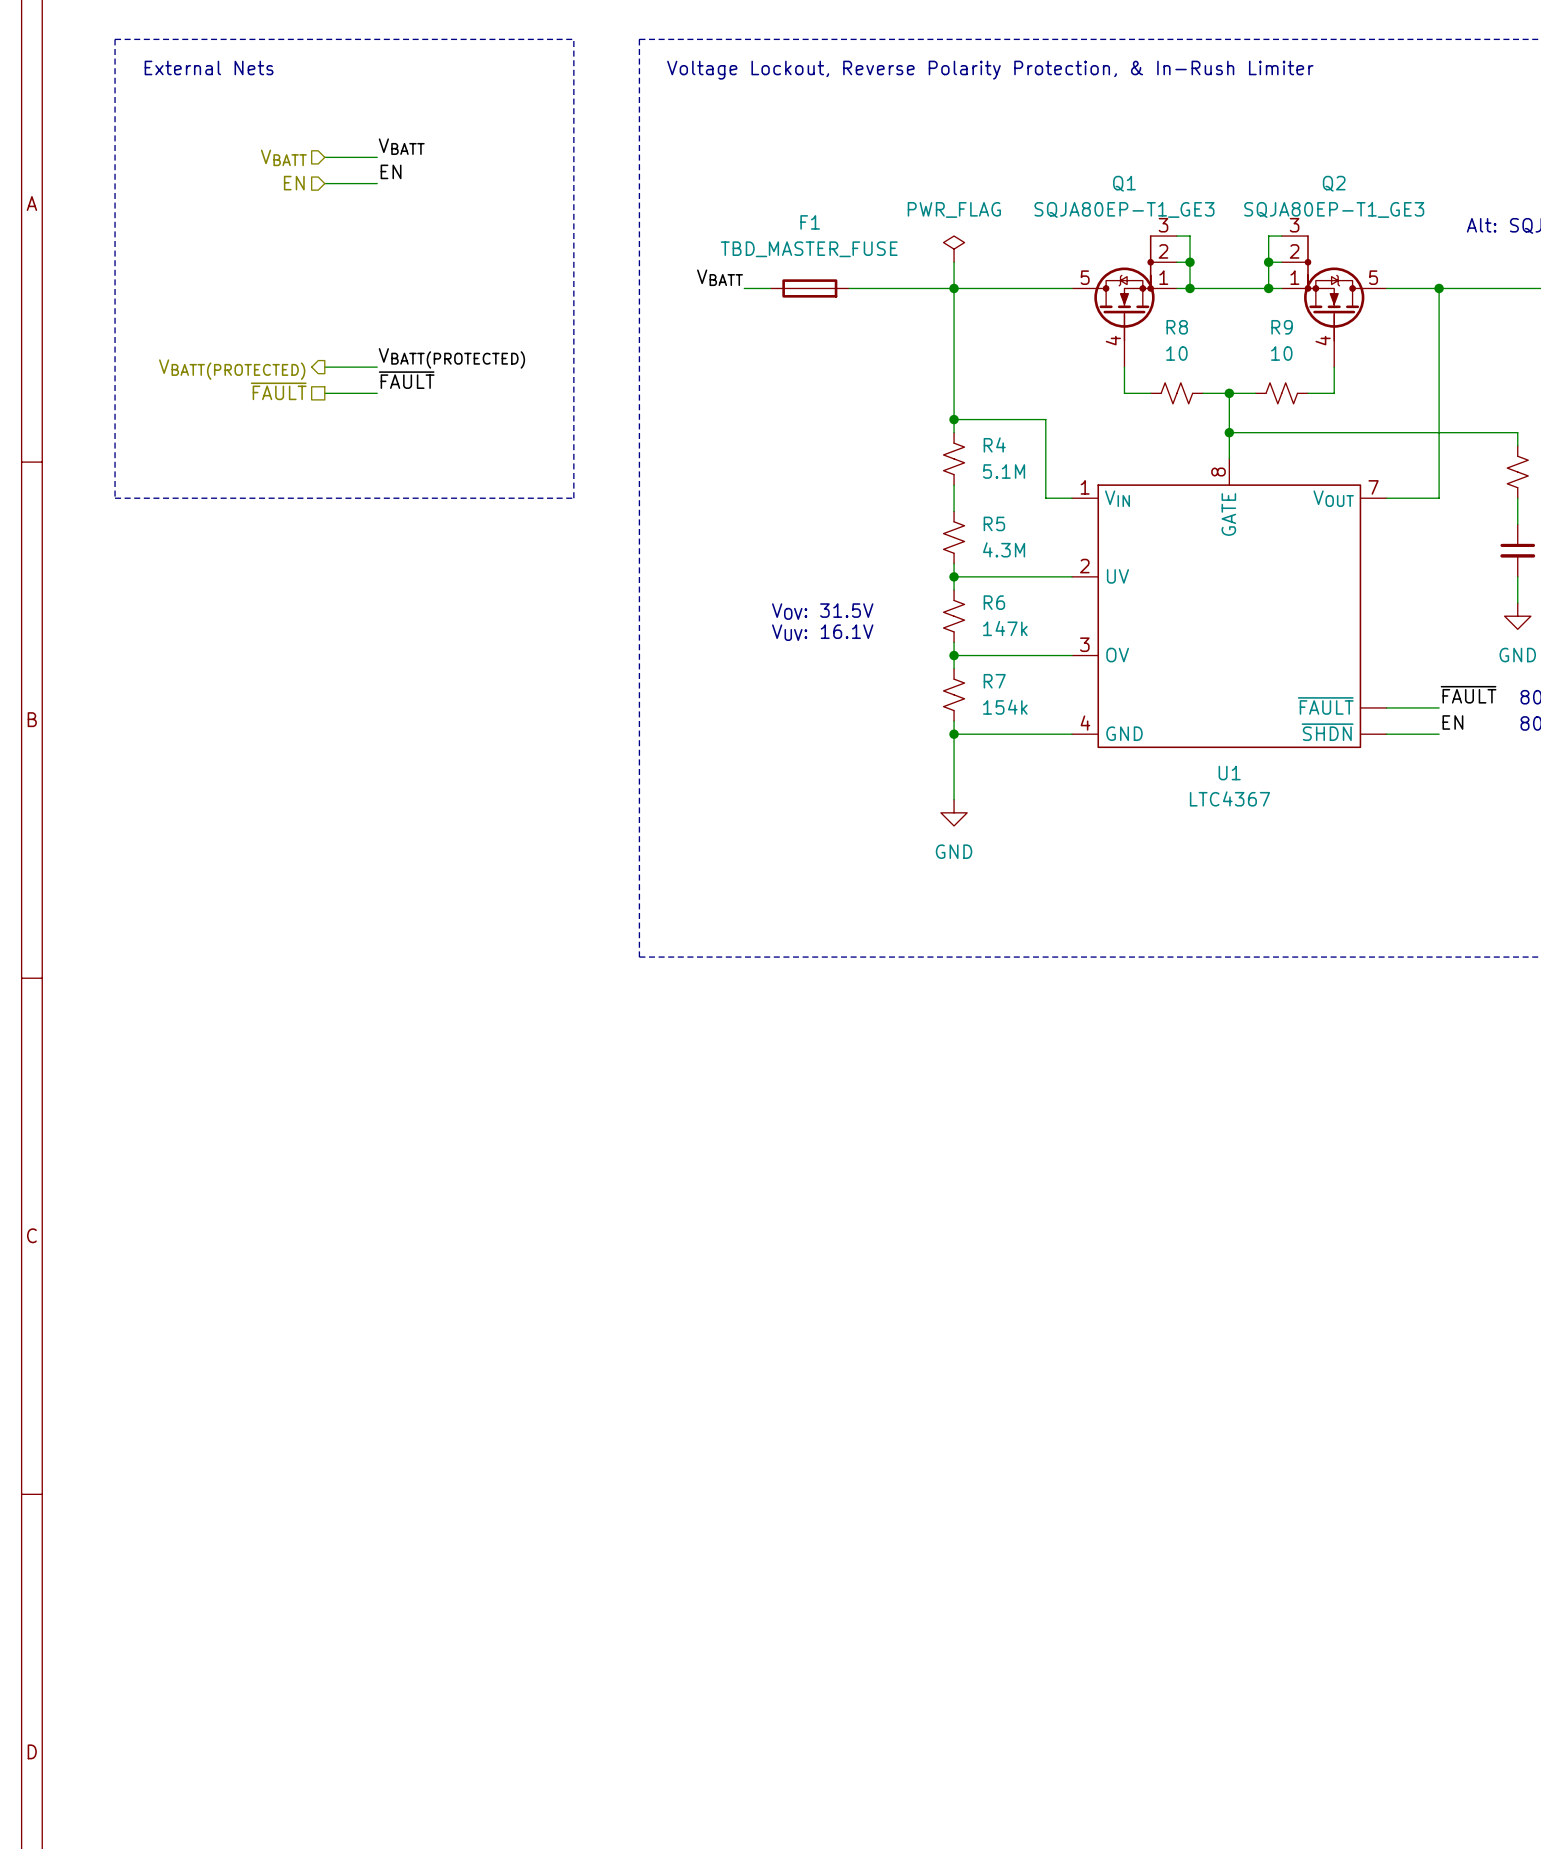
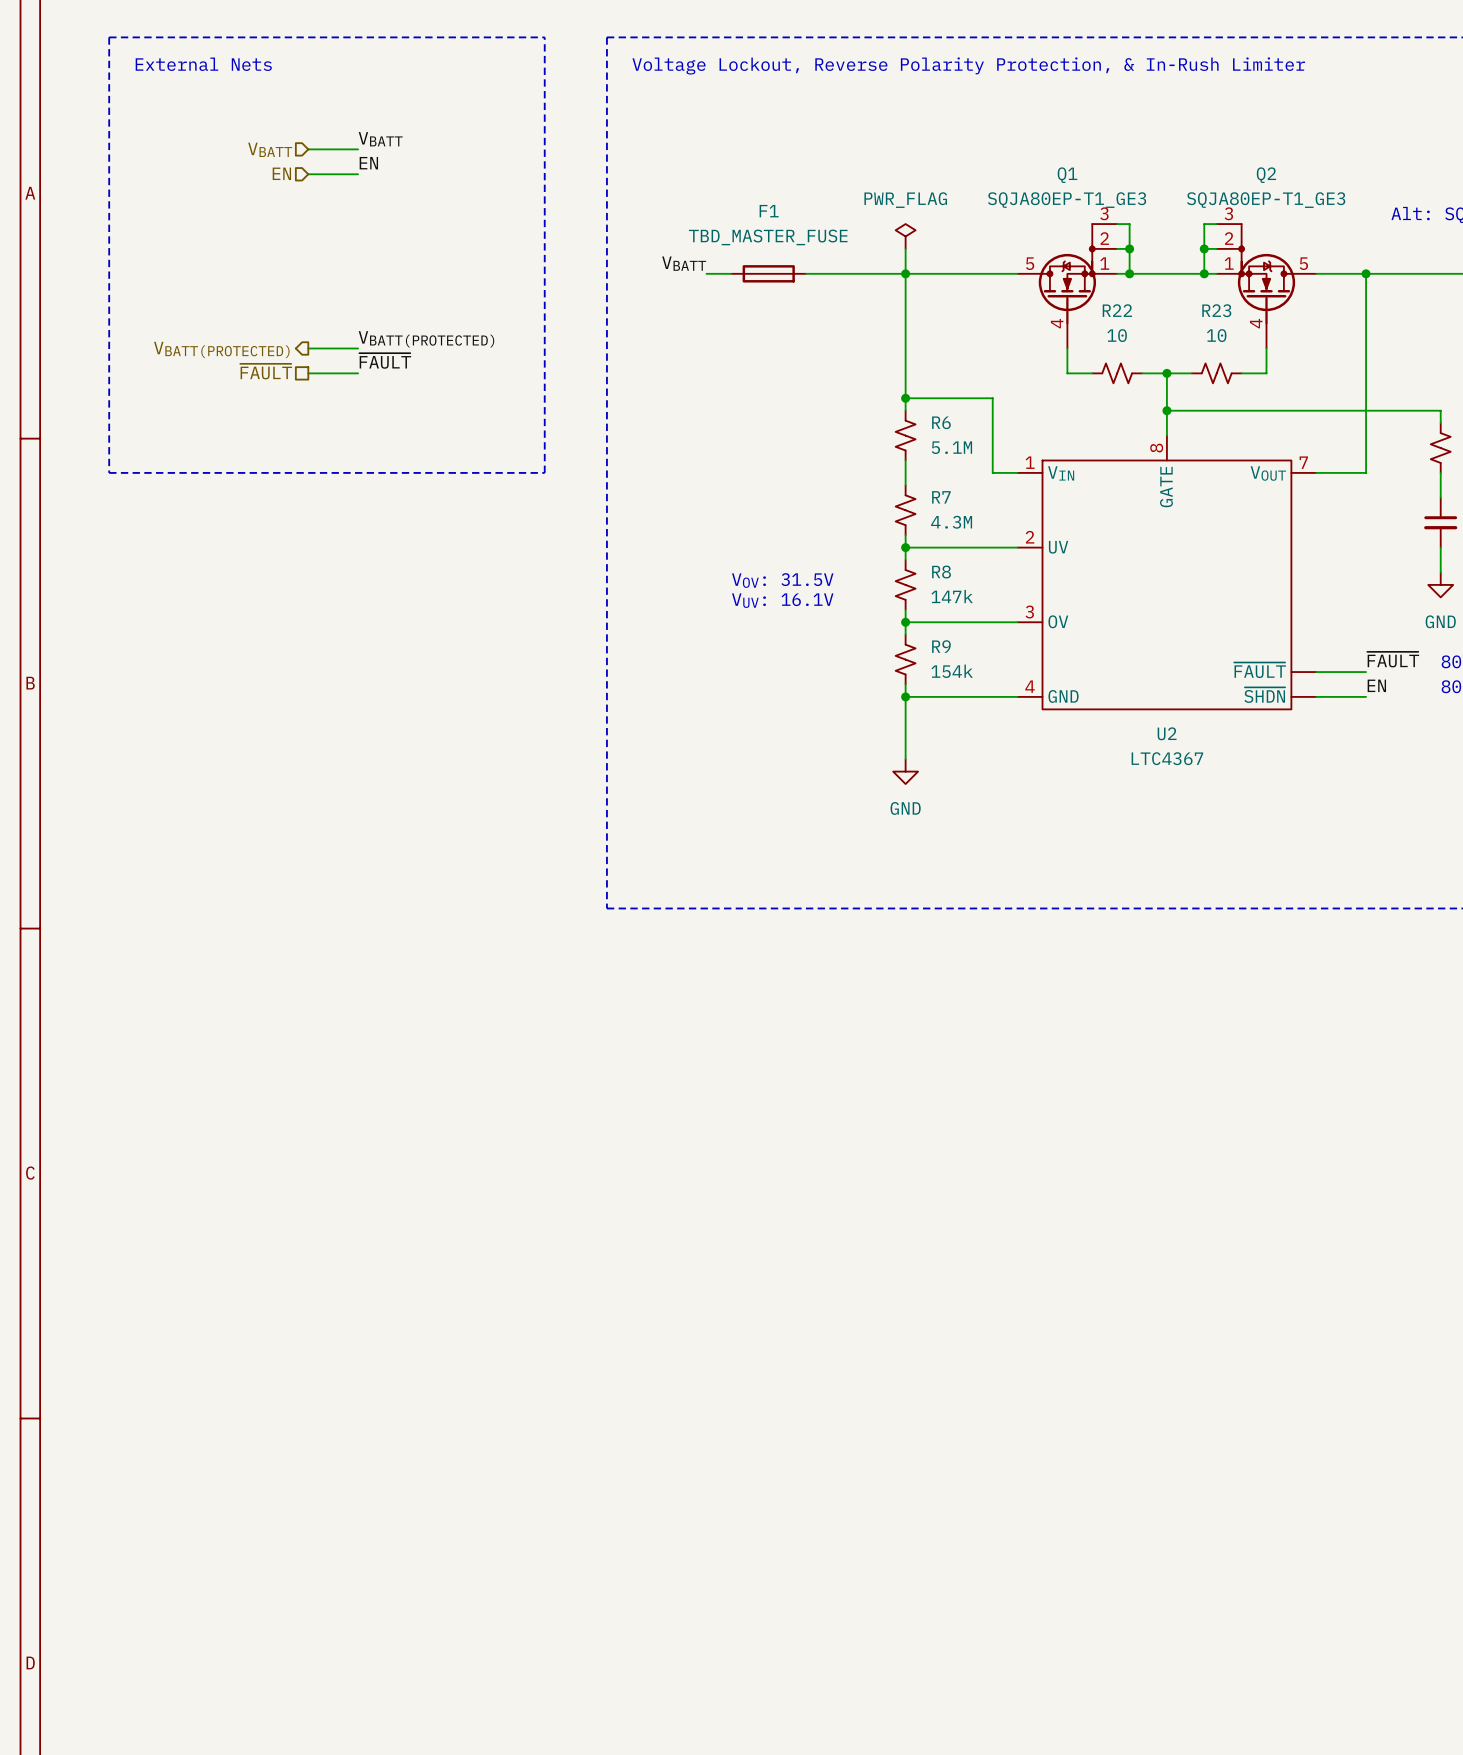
R8 name: R8 (1177, 327) -> R22 (1117, 310)
R9 name: R9 (1282, 327) -> R23 (1216, 310)
R4 name: R4 (994, 444) -> R6 (941, 422)
R5 name: R5 (994, 523) -> R7 (941, 497)
R6 name: R6 (994, 602) -> R8 (941, 572)
R7 name: R7 (994, 681) -> R9 (941, 646)
U1 name: U1 (1229, 773) -> U2 (1167, 733)

